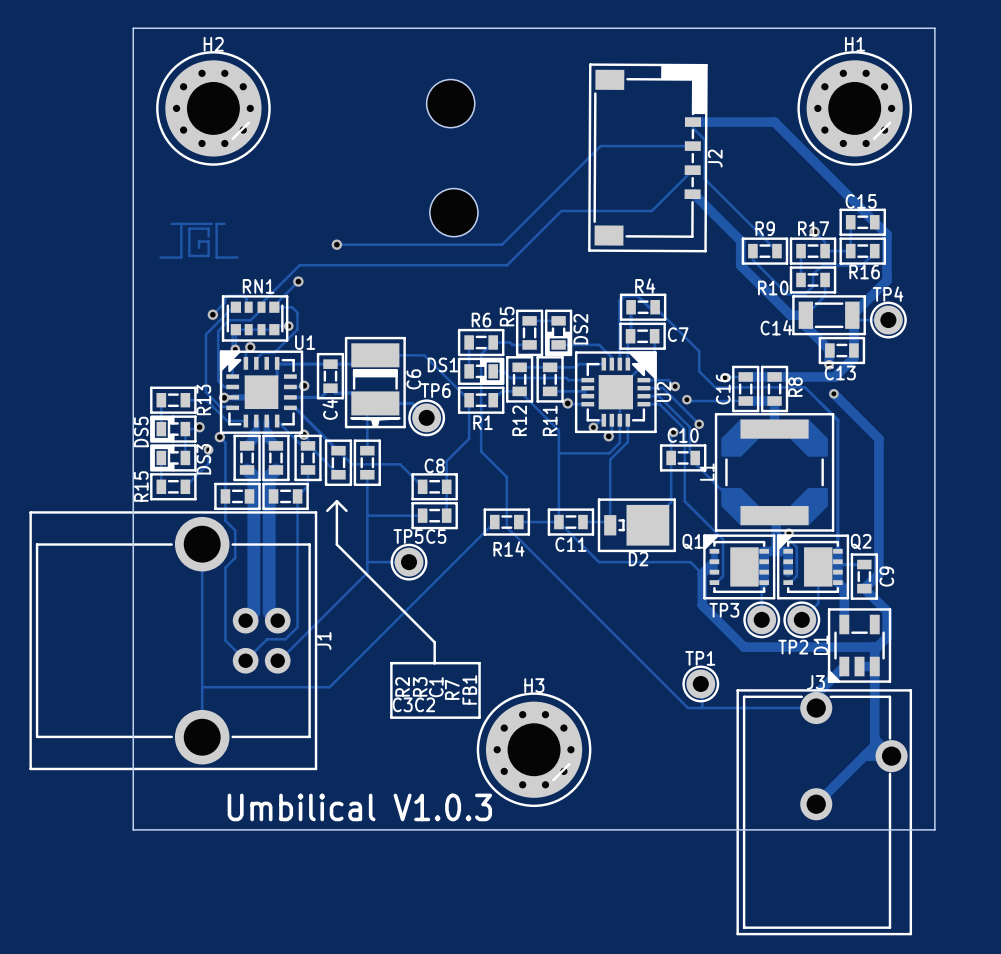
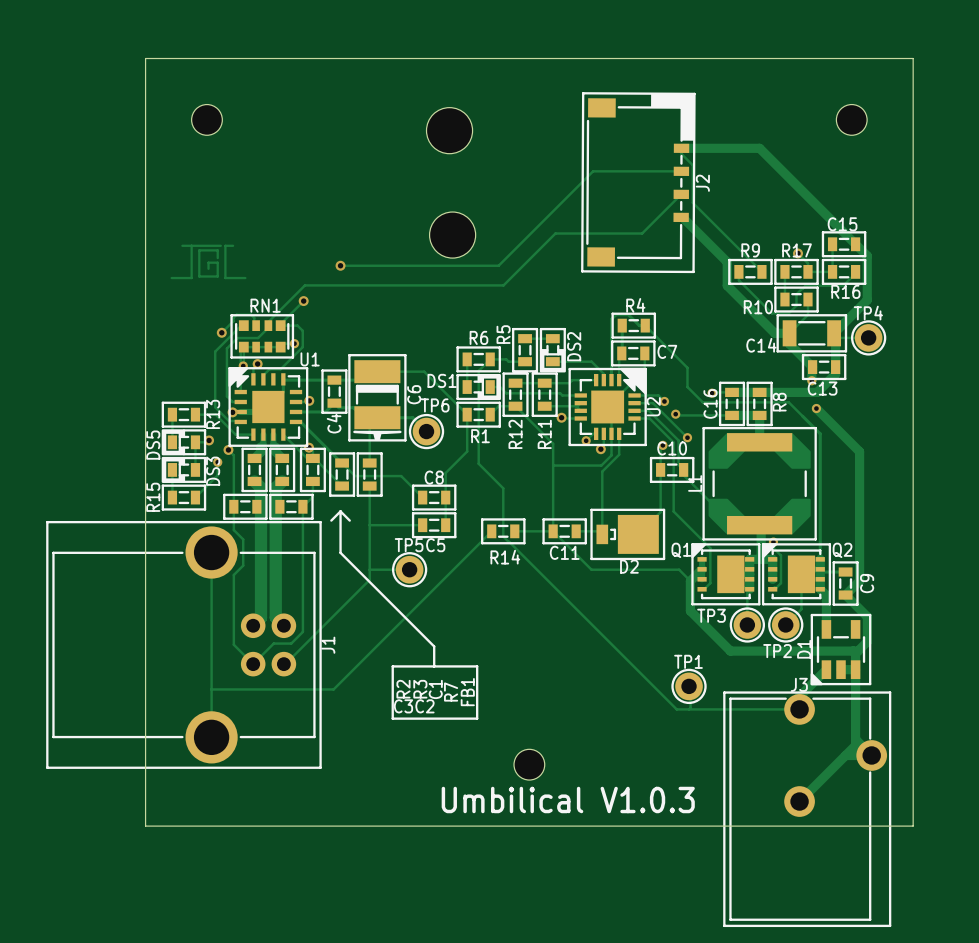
hole: none -> (206, 119)
hole: none -> (851, 119)
H2: (213, 108) -> none
H1: (854, 108) -> none
H3: (534, 749) -> none
hole: none -> (529, 764)
text position: Umbilical V1.0.3 (359, 807) -> Umbilical V1.0.3 (568, 800)

